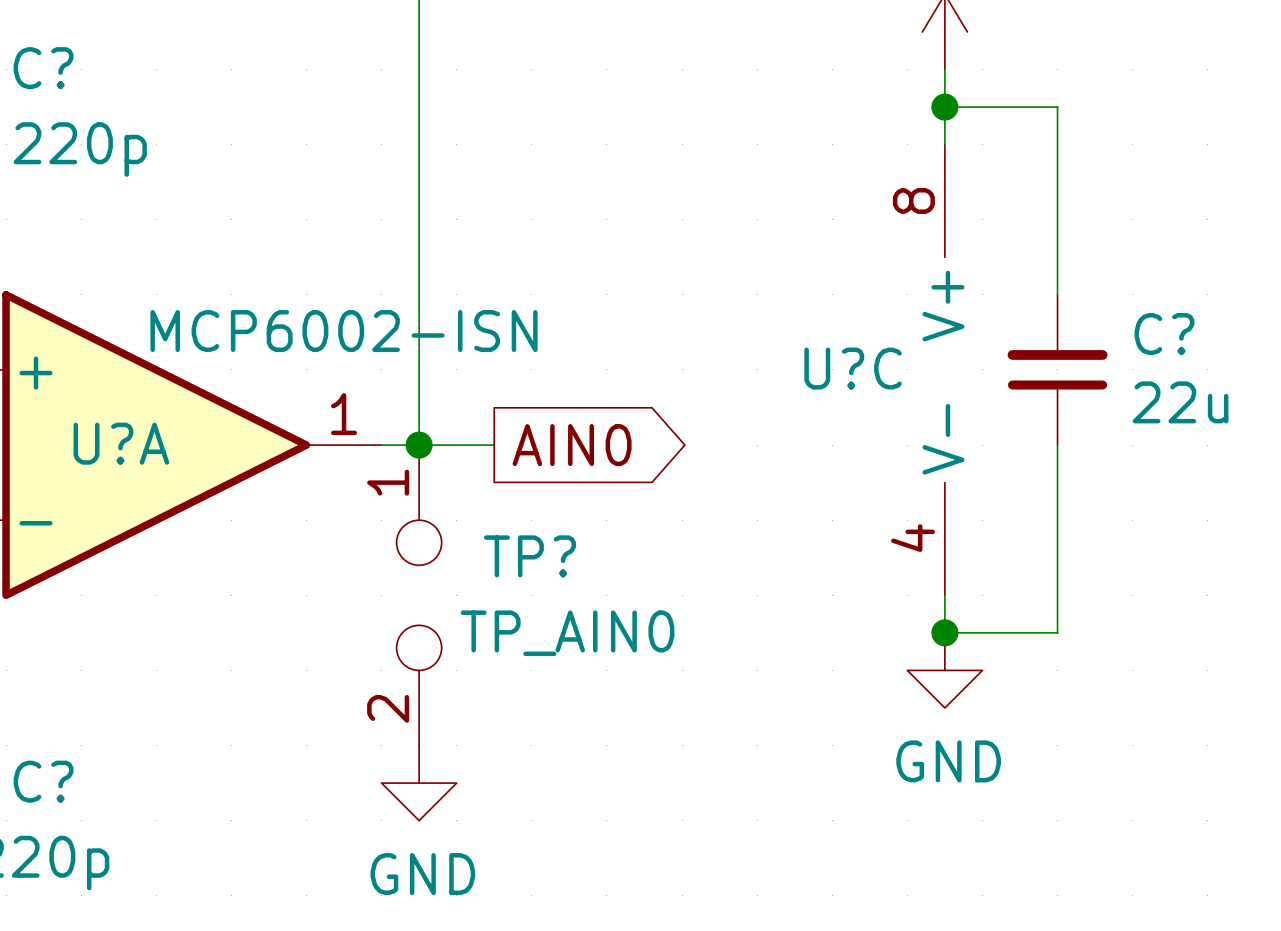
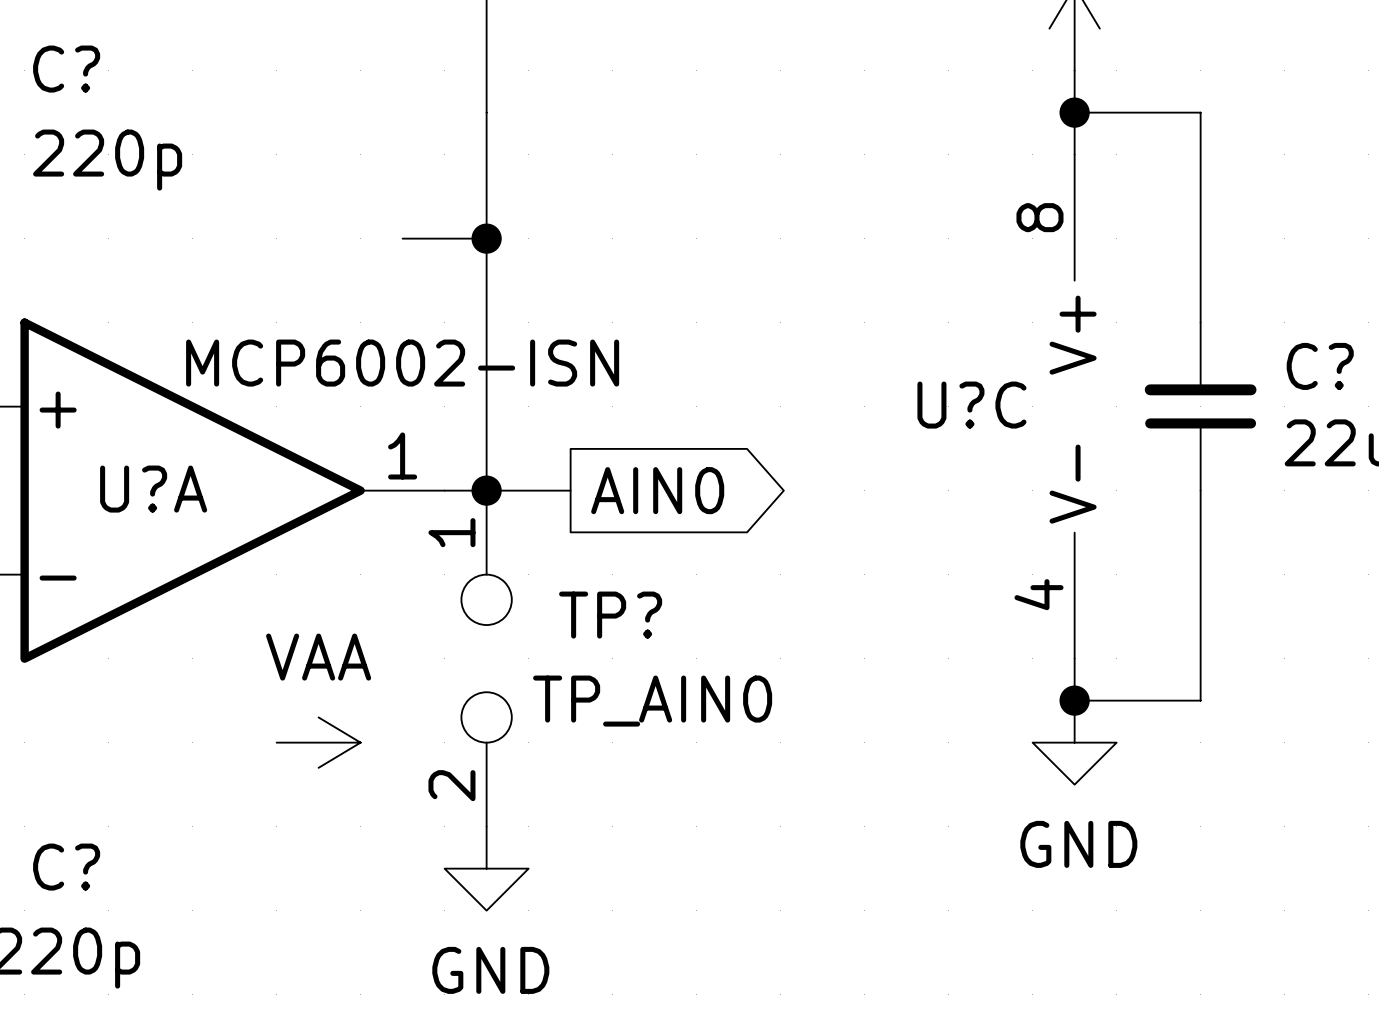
wire: none -> (402, 238) (486, 238)
junction: none -> (486, 238)
power symbol: none -> VAA (318, 742)

